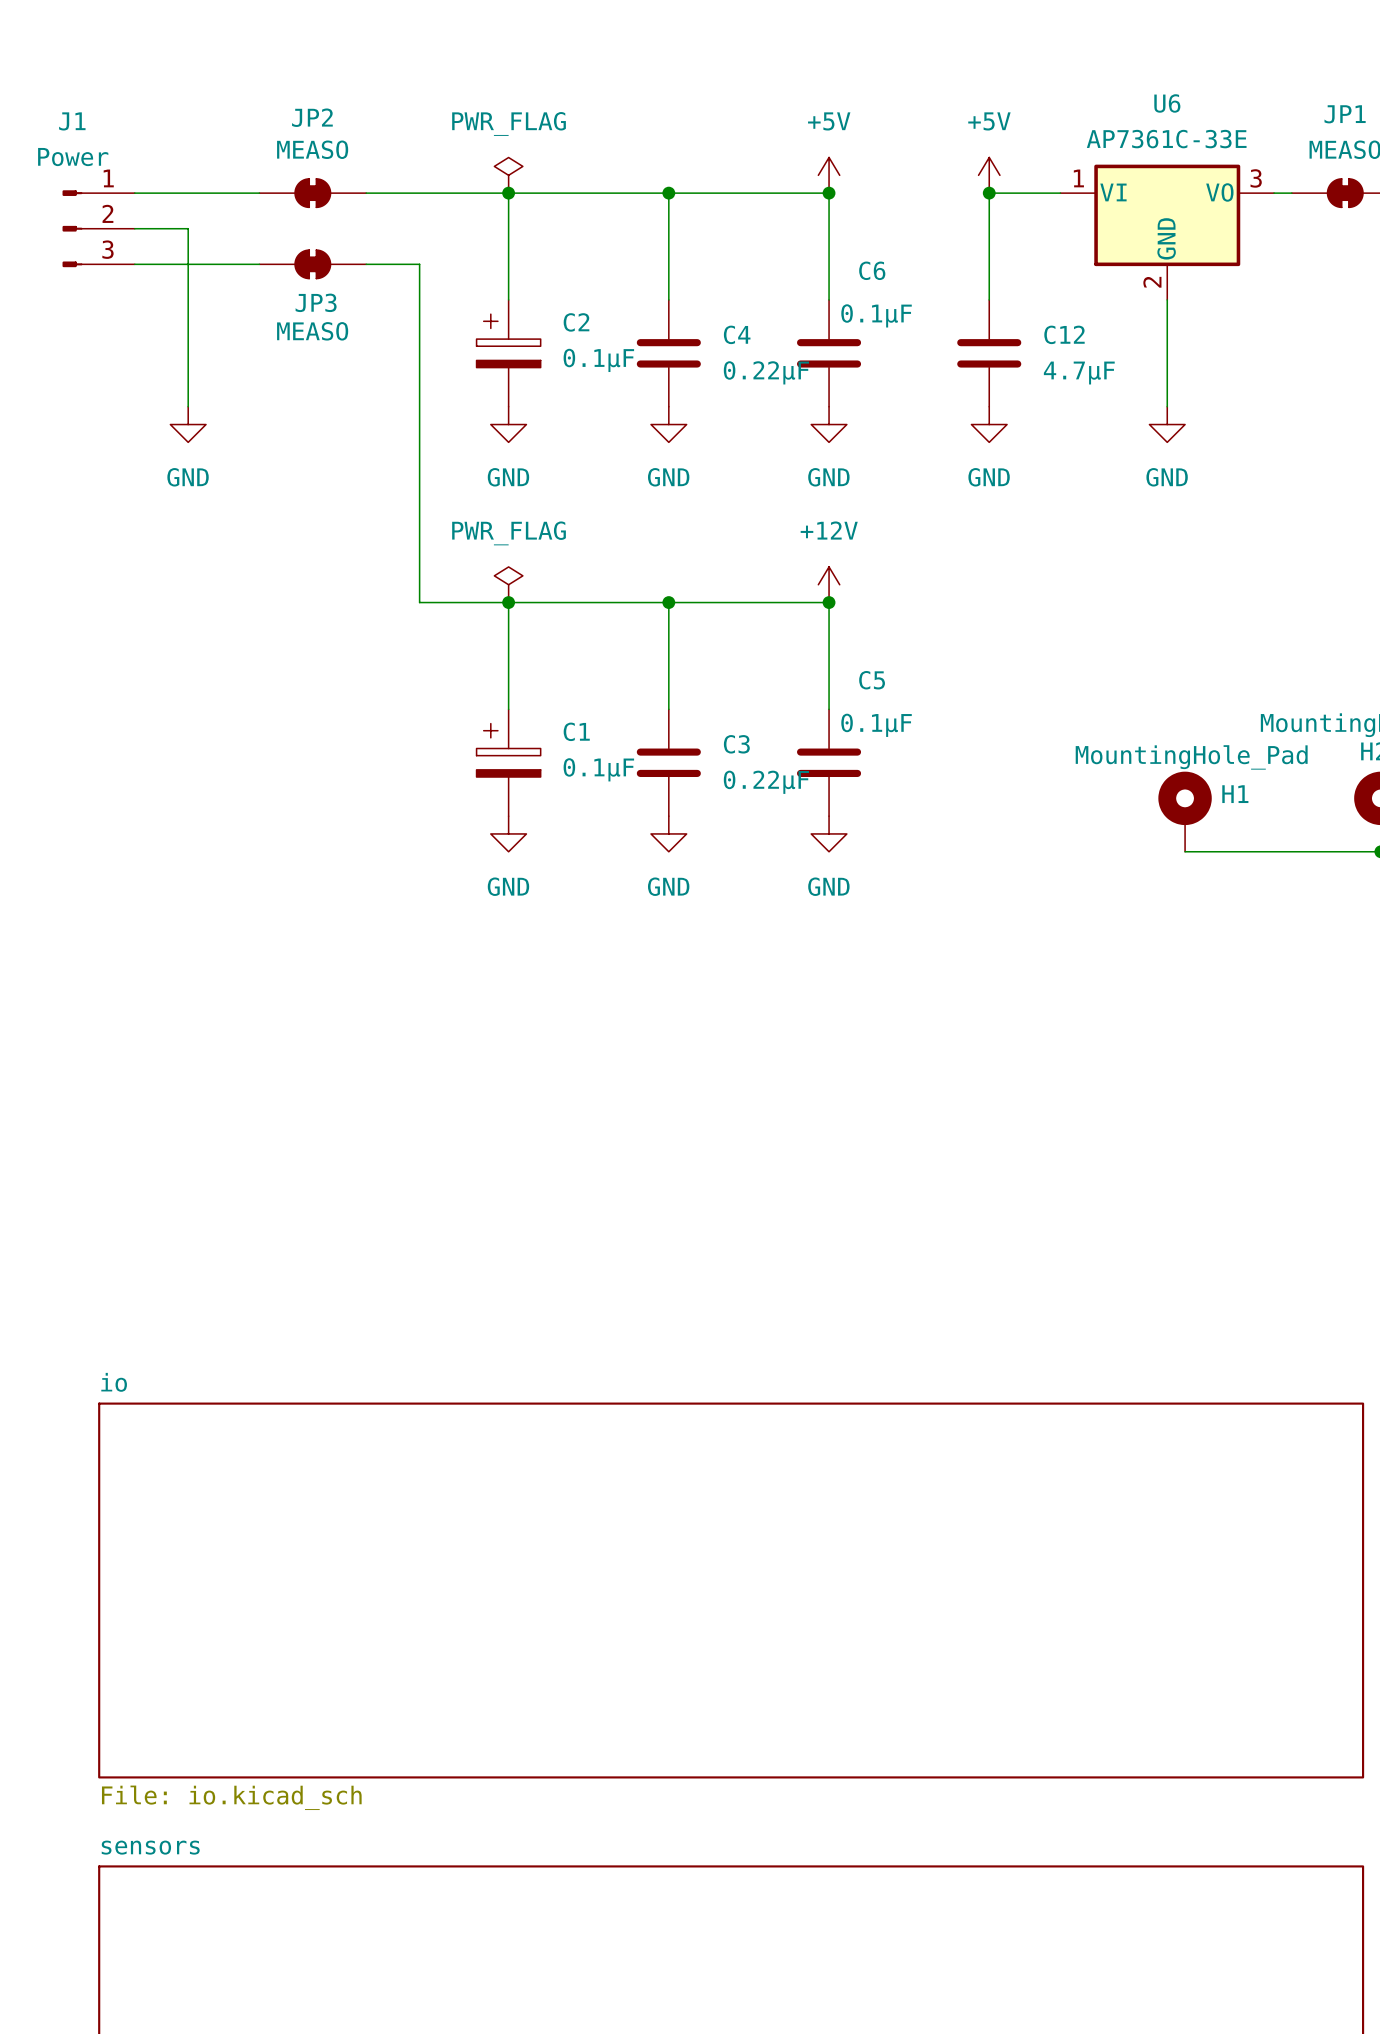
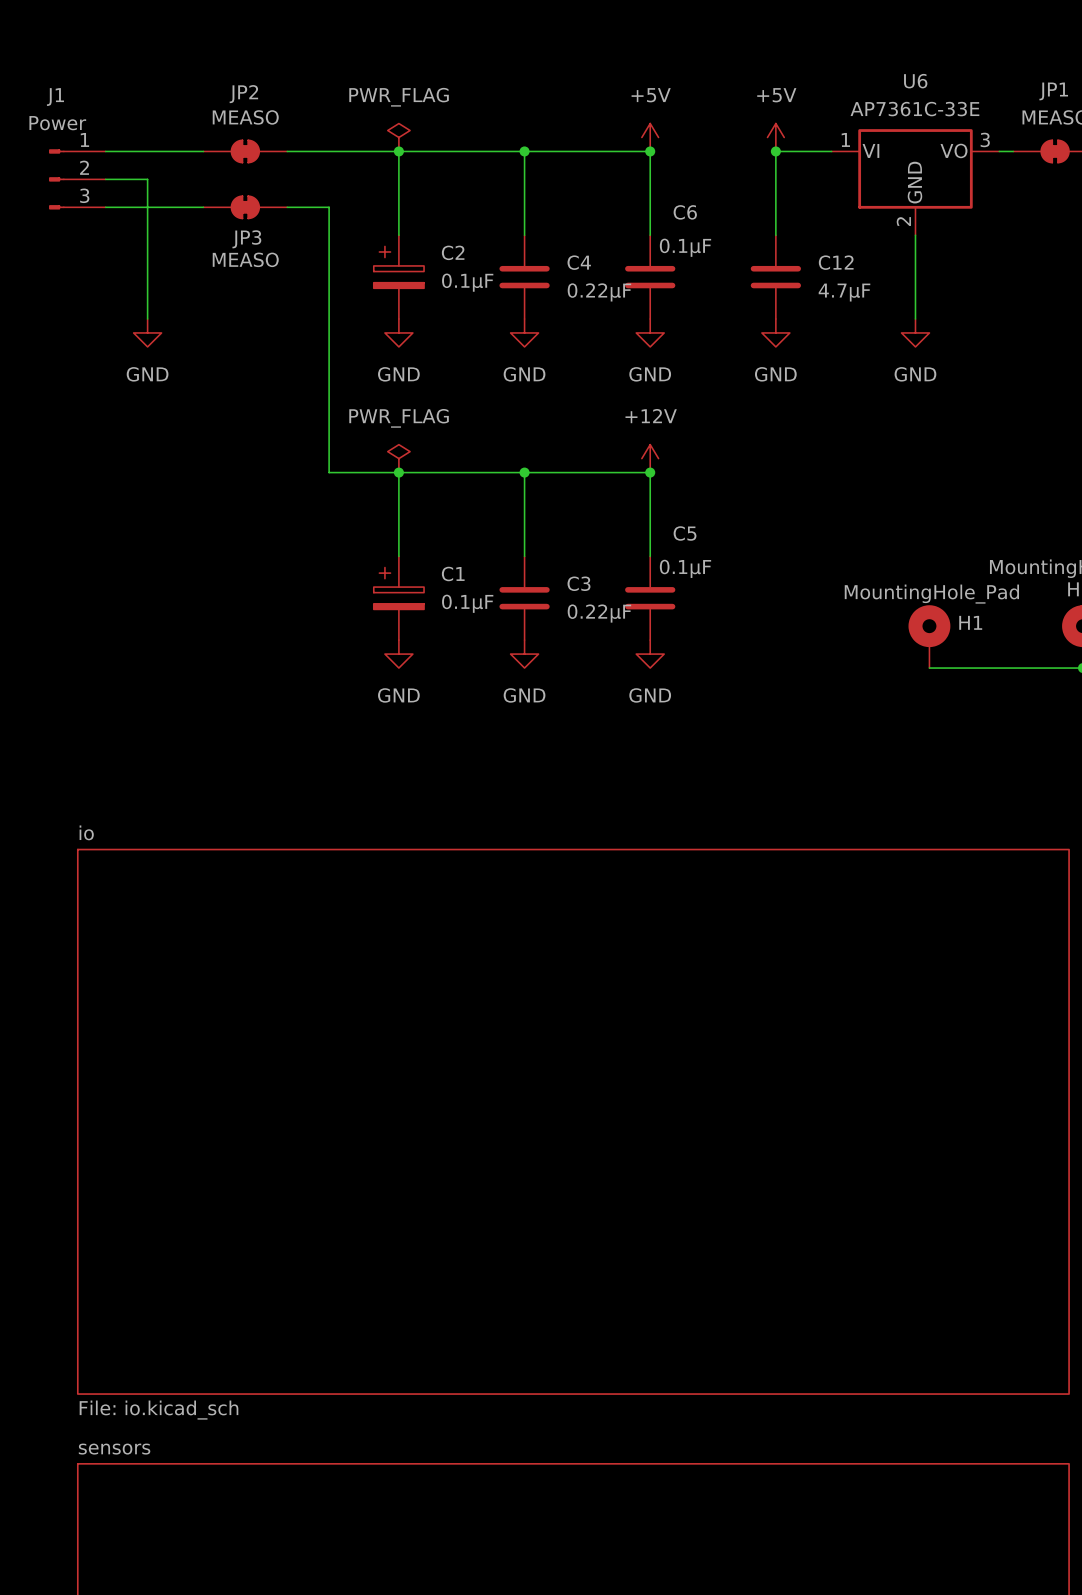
sheet io: none -> File: io.kicad_sch (573, 1121)
sheet io: File: io.kicad_sch (731, 1590) -> none

